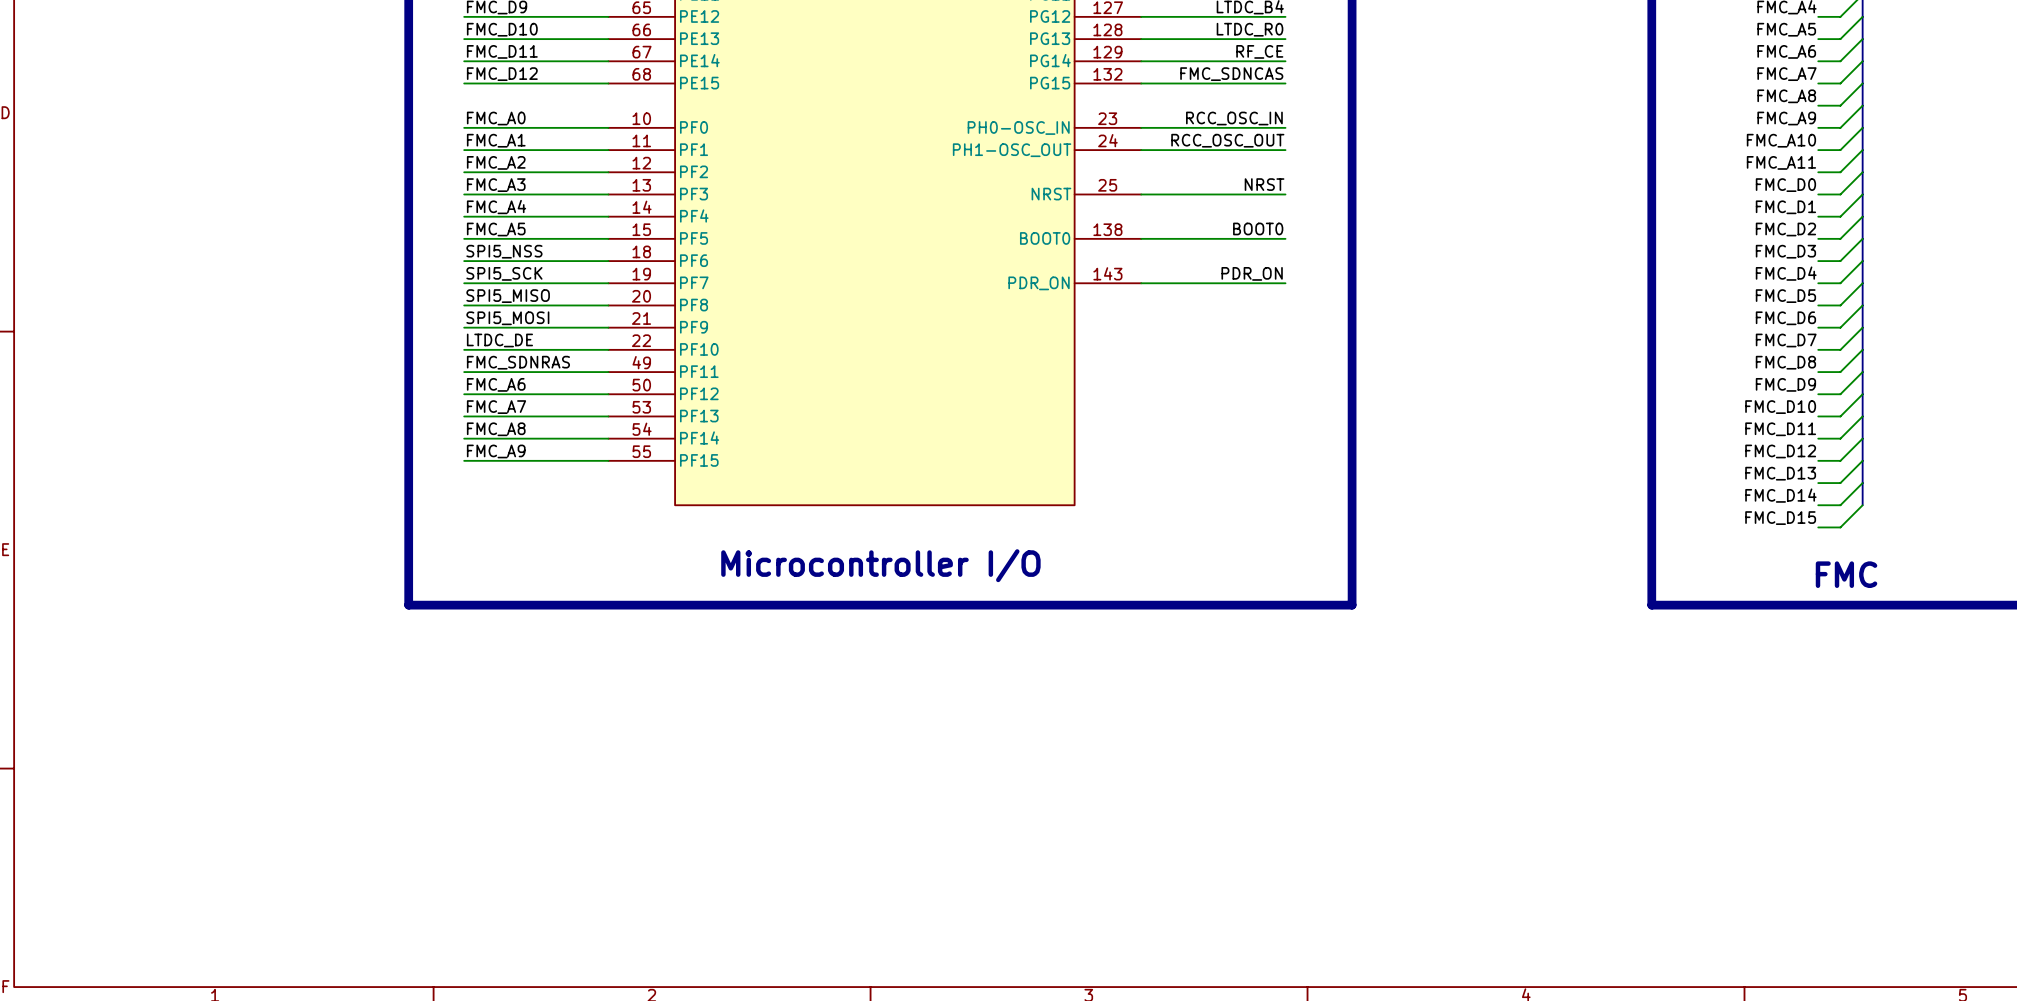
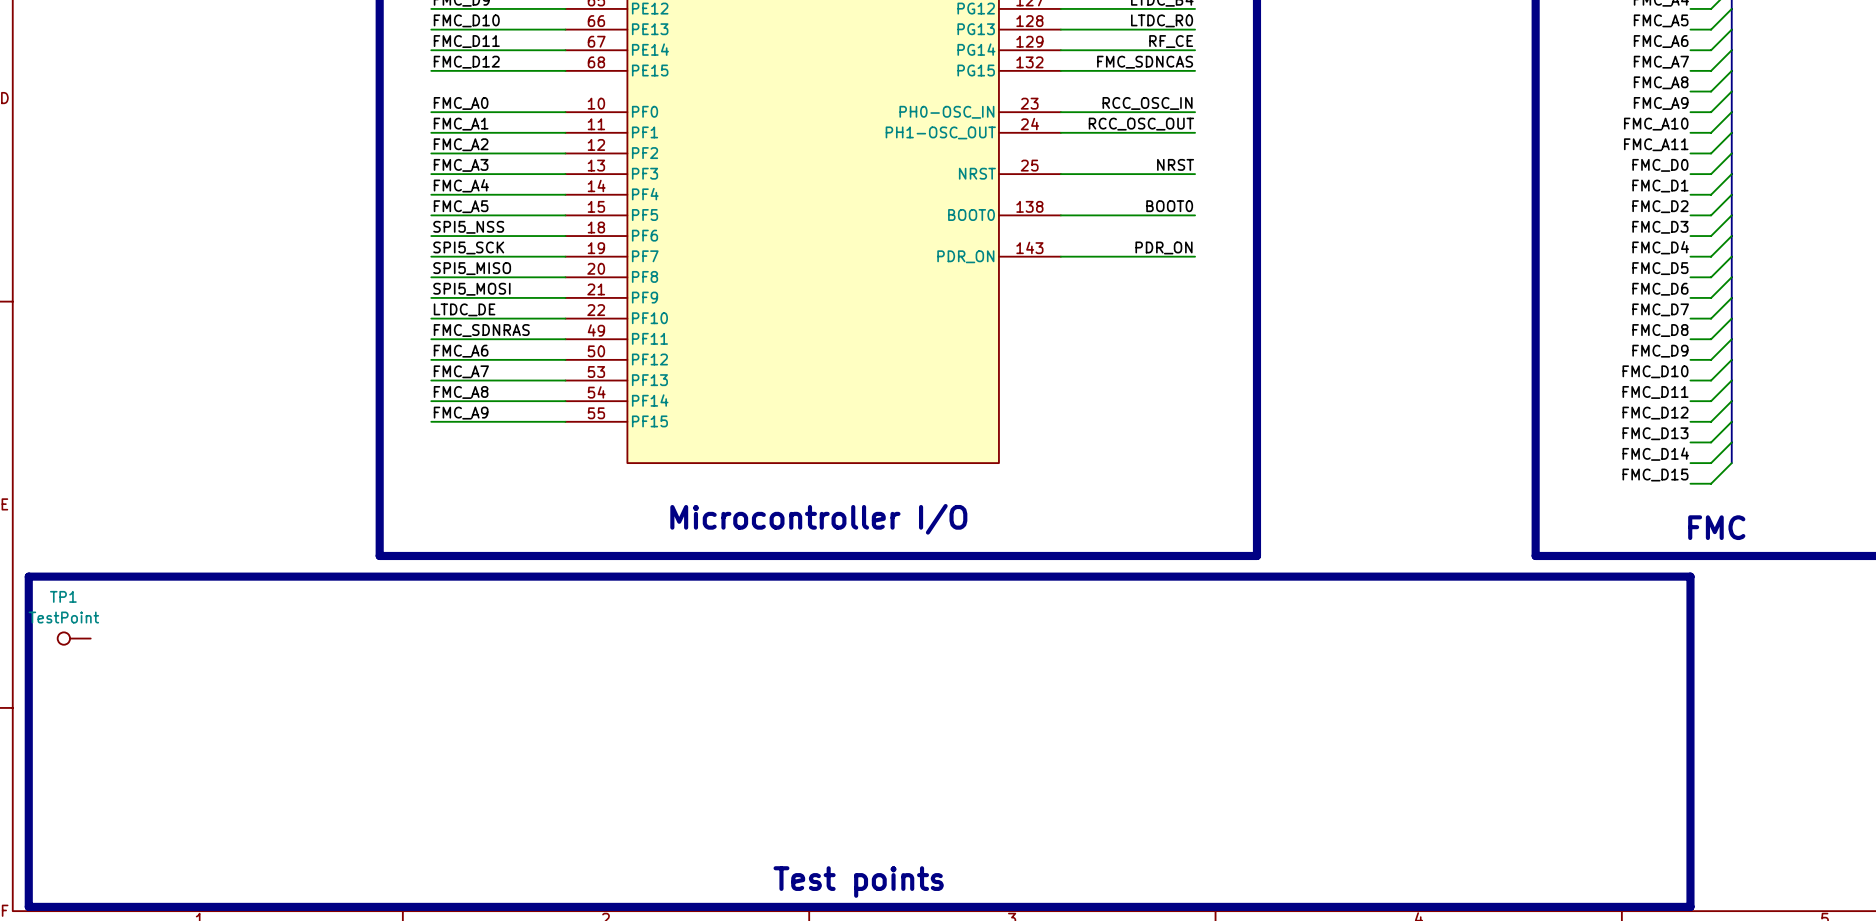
line: none -> (28, 576) (1690, 576) (1690, 906) (28, 906) (28, 576)
TP1: none -> TestPoint (74, 638)
text: none -> Test points (858, 882)

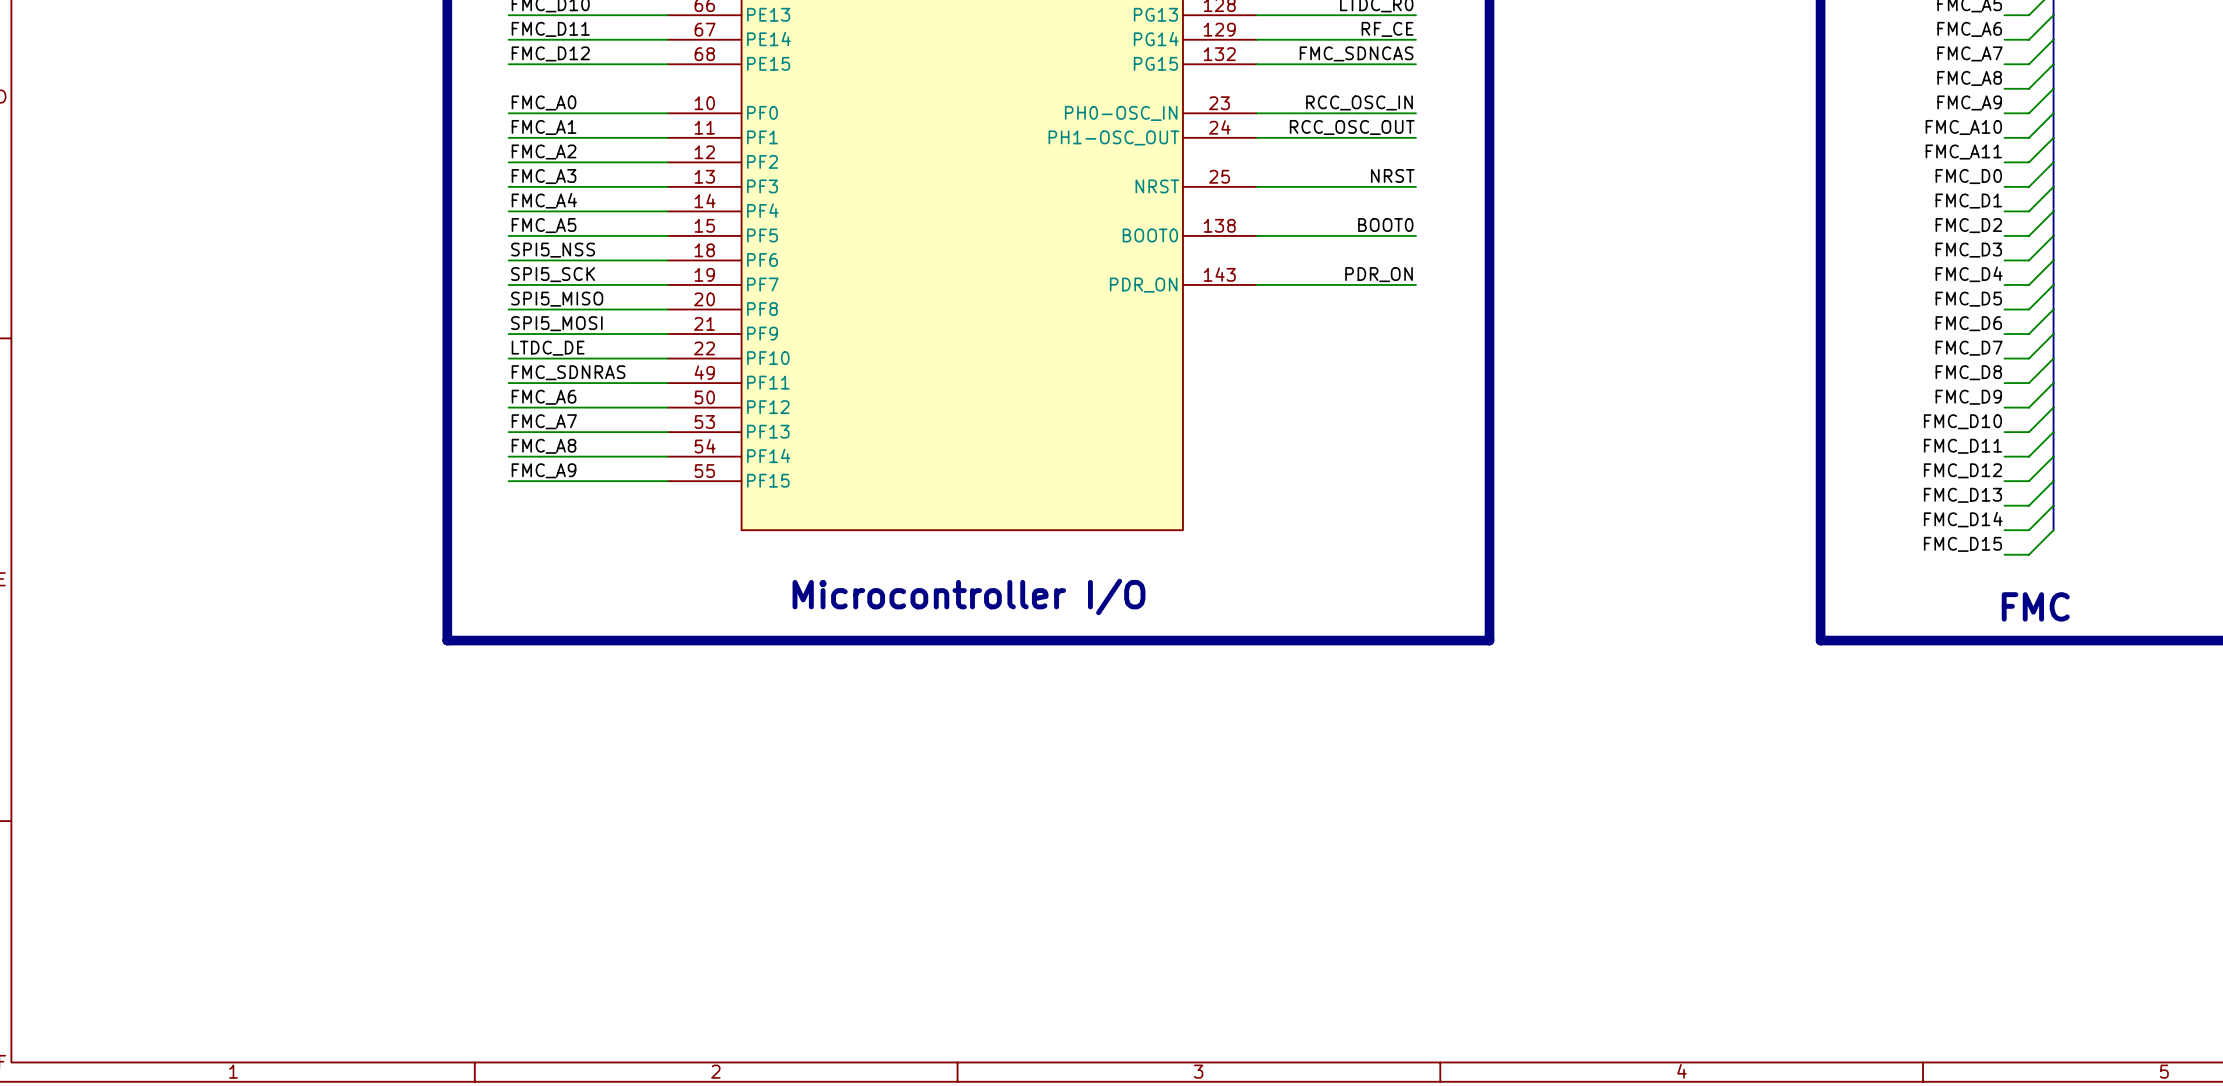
line: (28, 576) (1690, 576) (1690, 906) (28, 906) (28, 576) -> none
TP1: TestPoint (74, 638) -> none
text: Test points (858, 882) -> none

